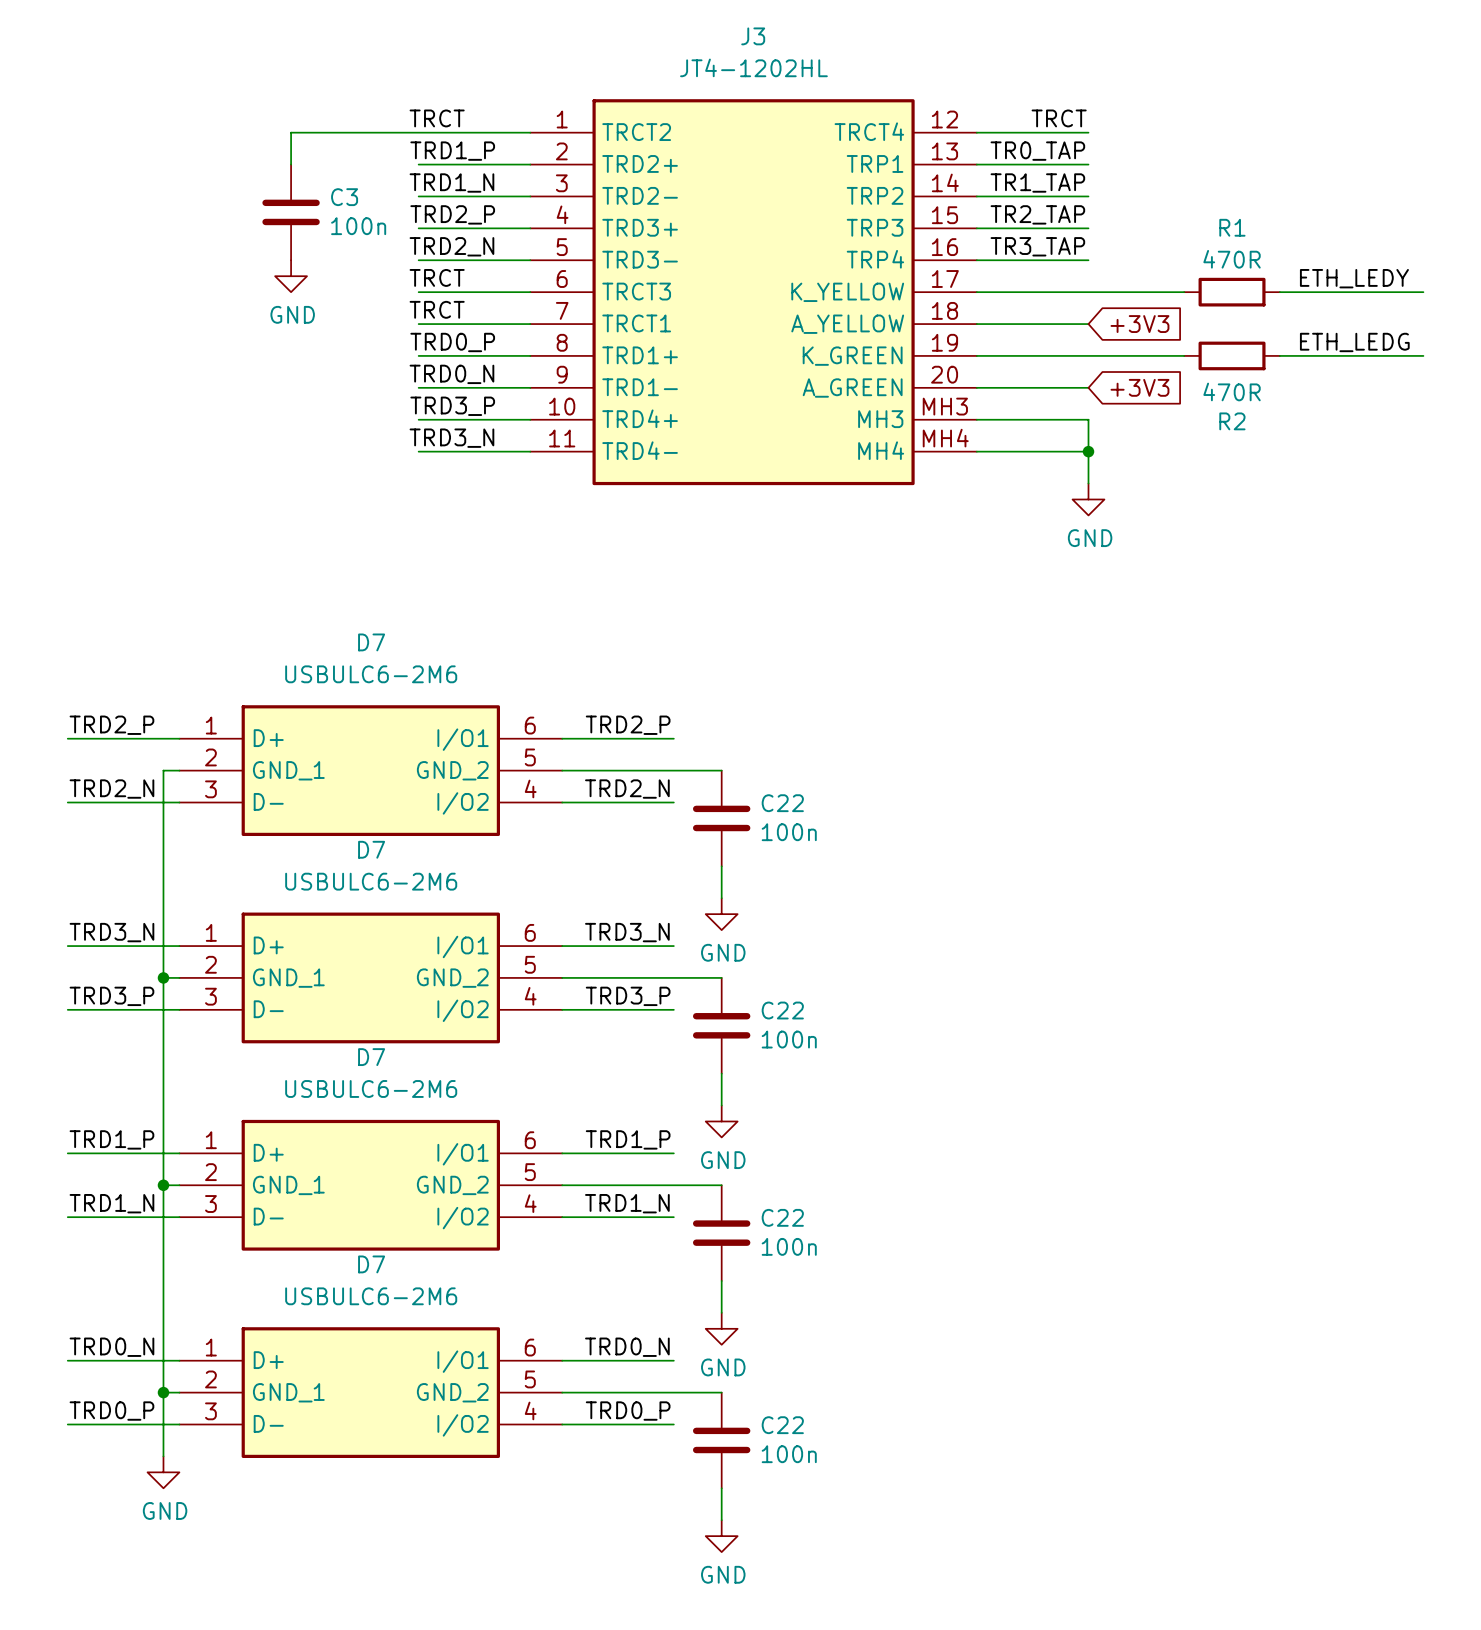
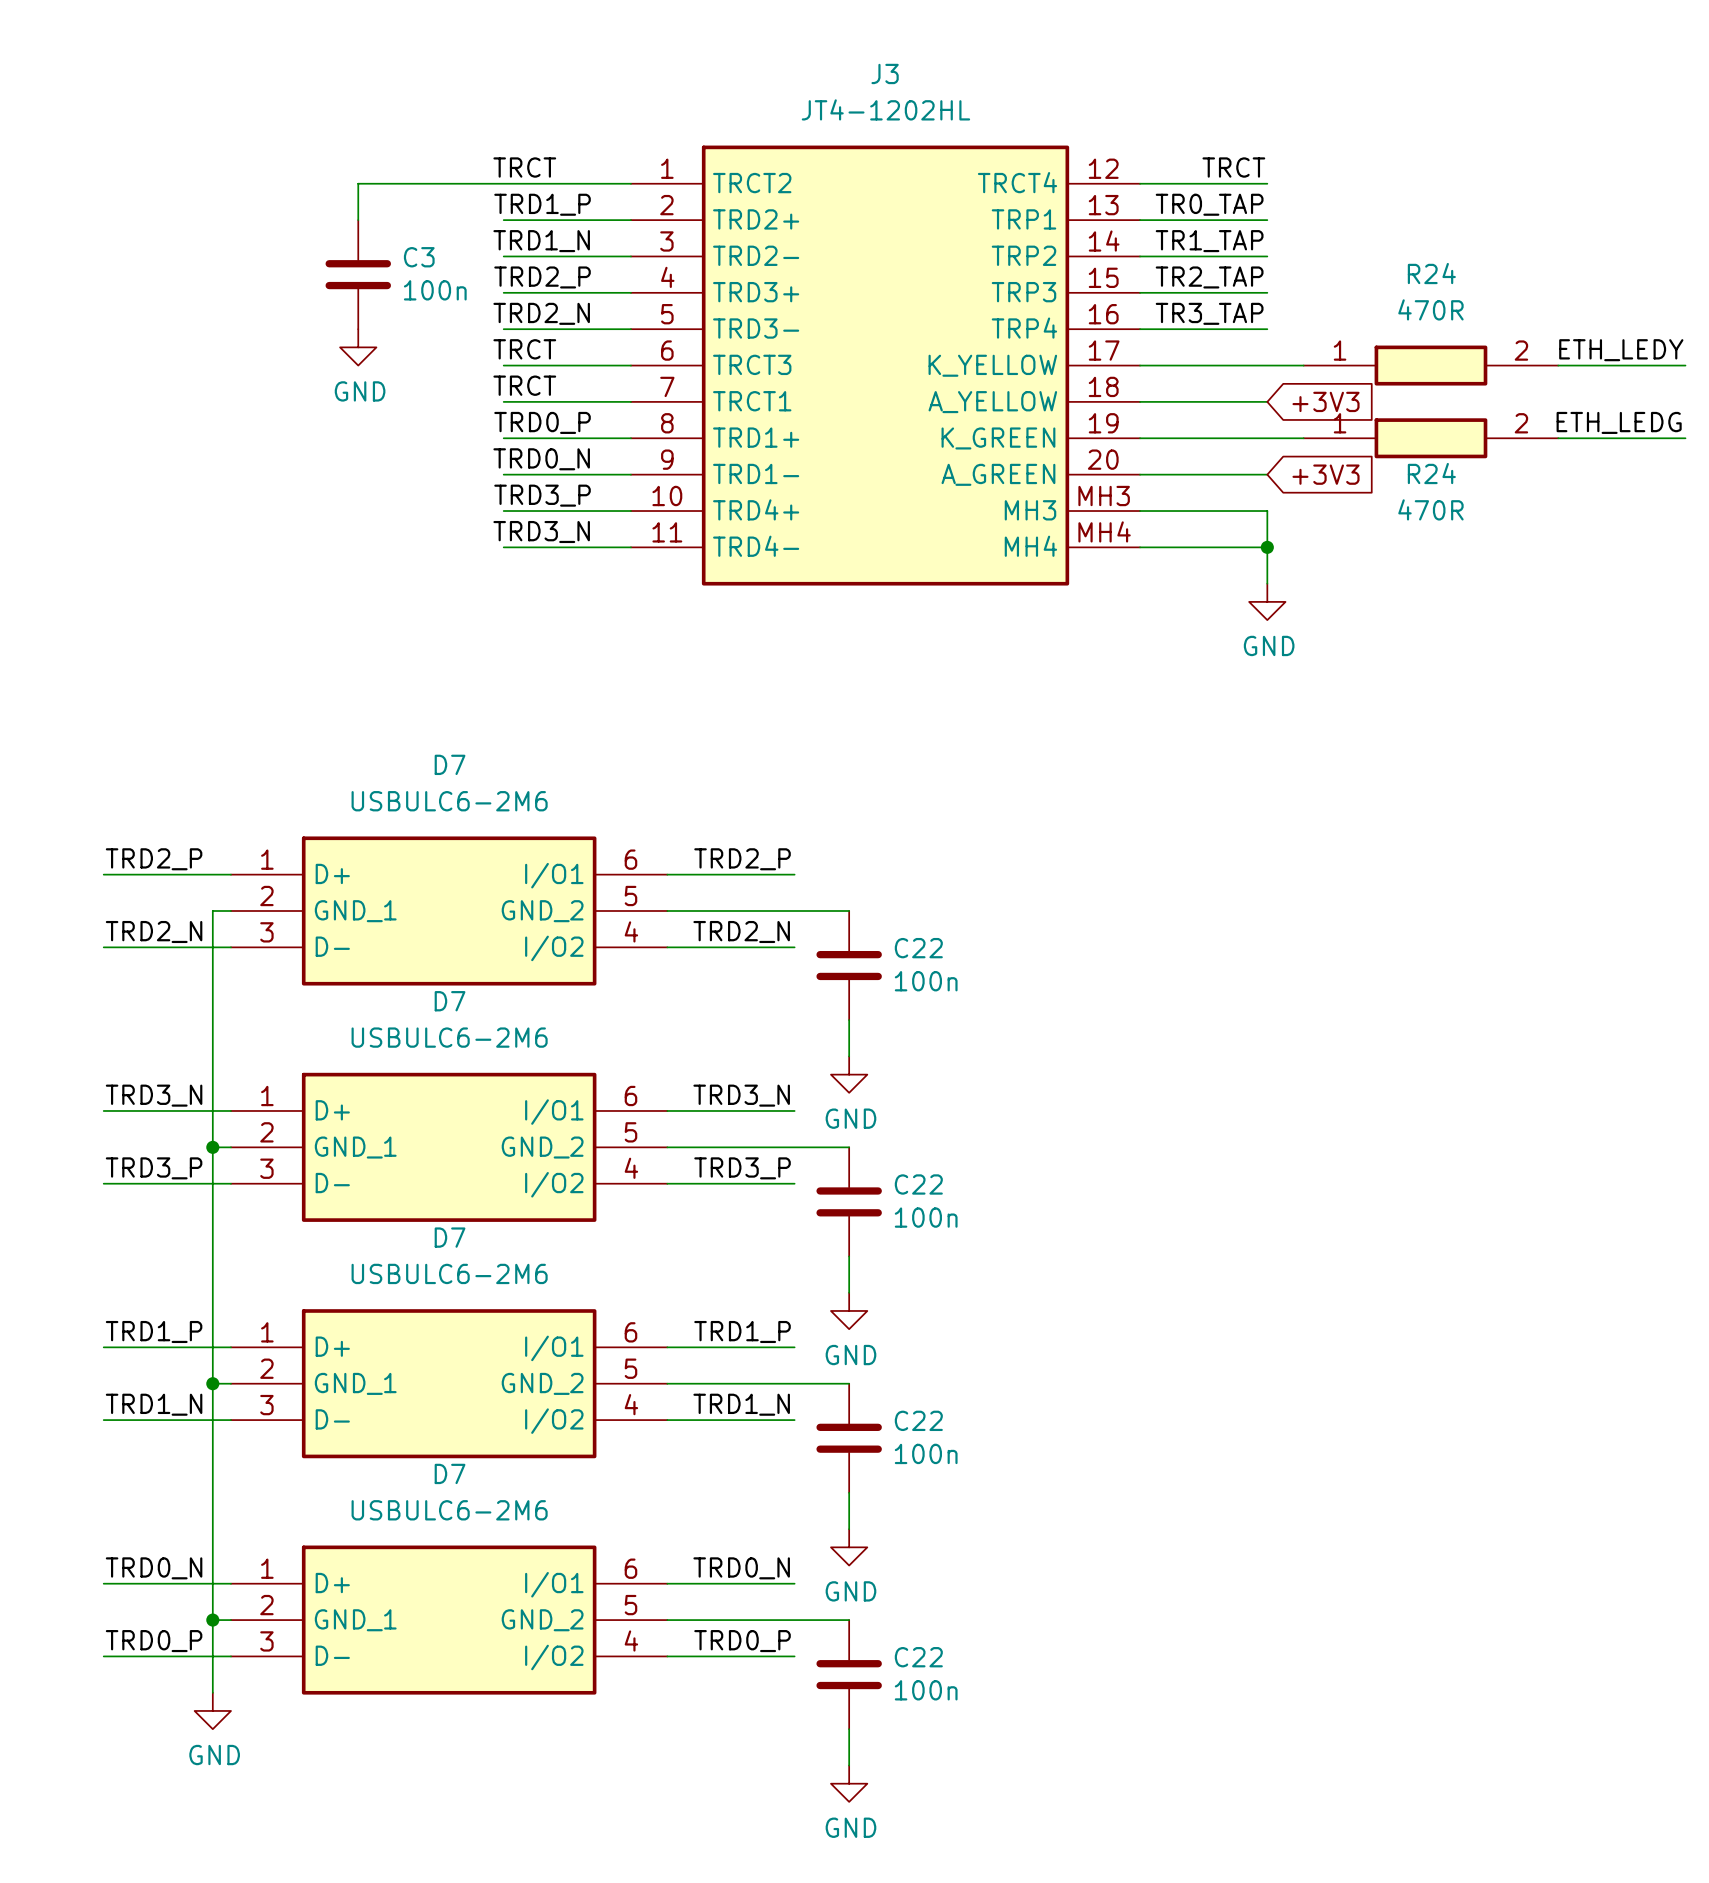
label position: ETH_LEDY (1354, 278) -> ETH_LEDY (1621, 350)
R1: 470R (1232, 292) -> none
R24: none -> 470R (1430, 365)
wire: none -> (1649, 365) (1685, 365)
label position: ETH_LEDG (1354, 342) -> ETH_LEDG (1619, 422)
R2: 470R (1232, 355) -> none
R24: none -> 470R (1430, 438)
wire: none -> (1649, 438) (1685, 438)

